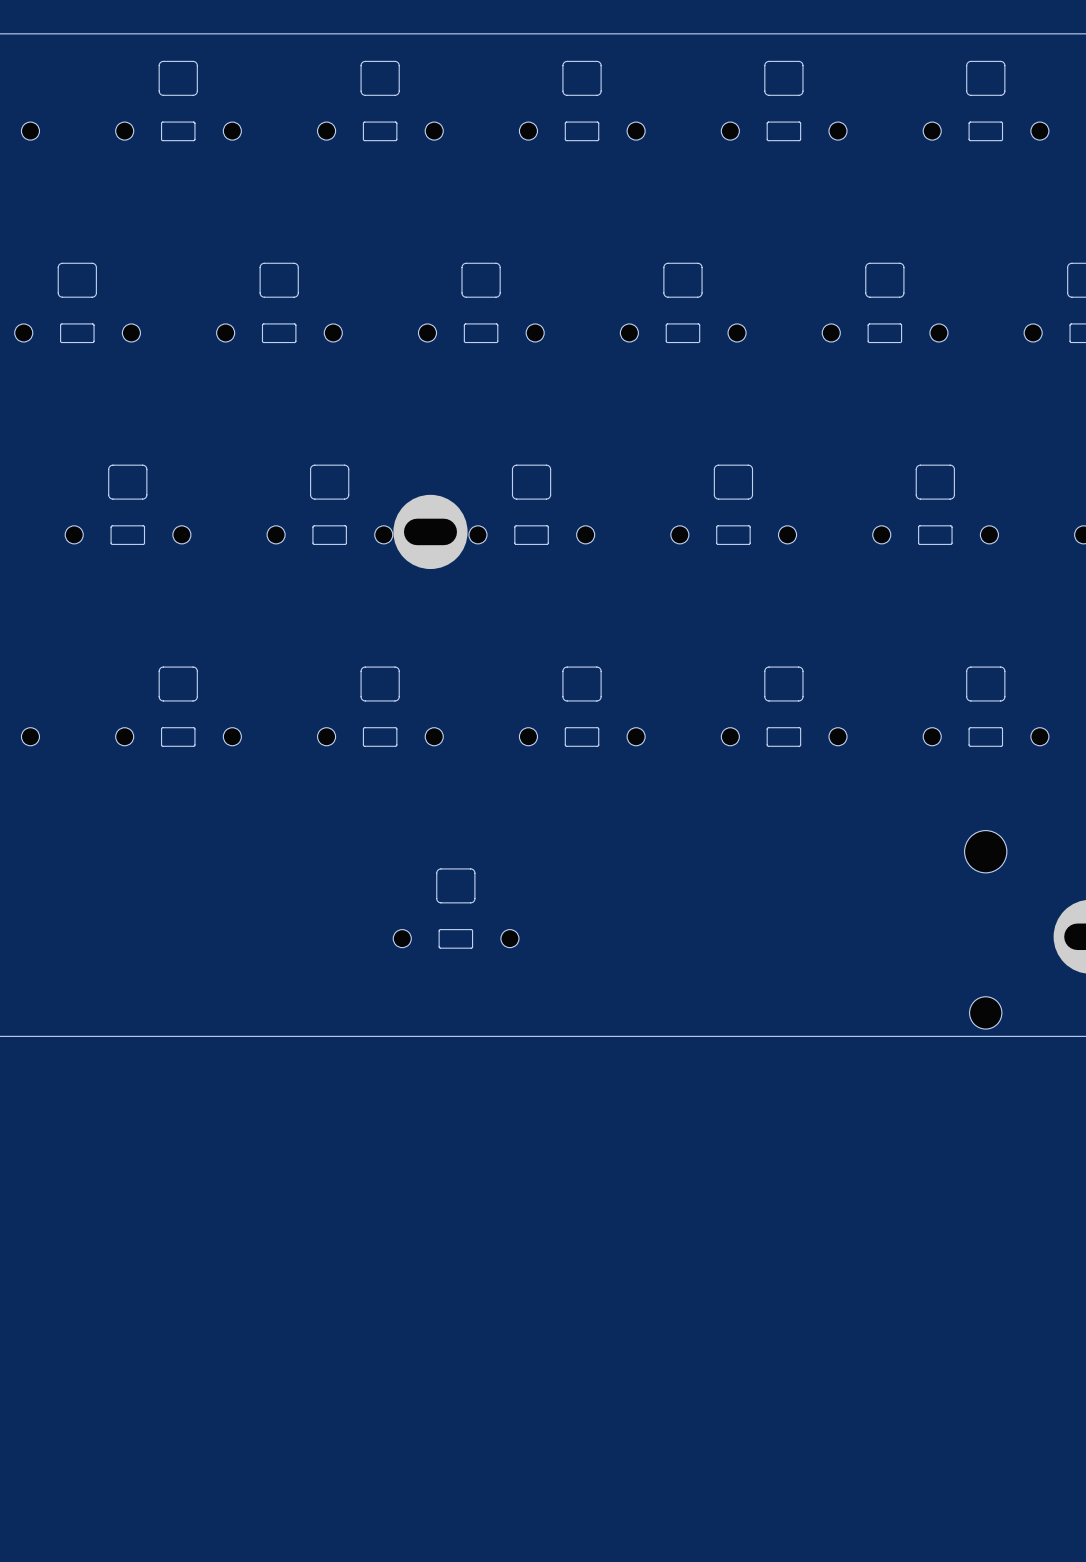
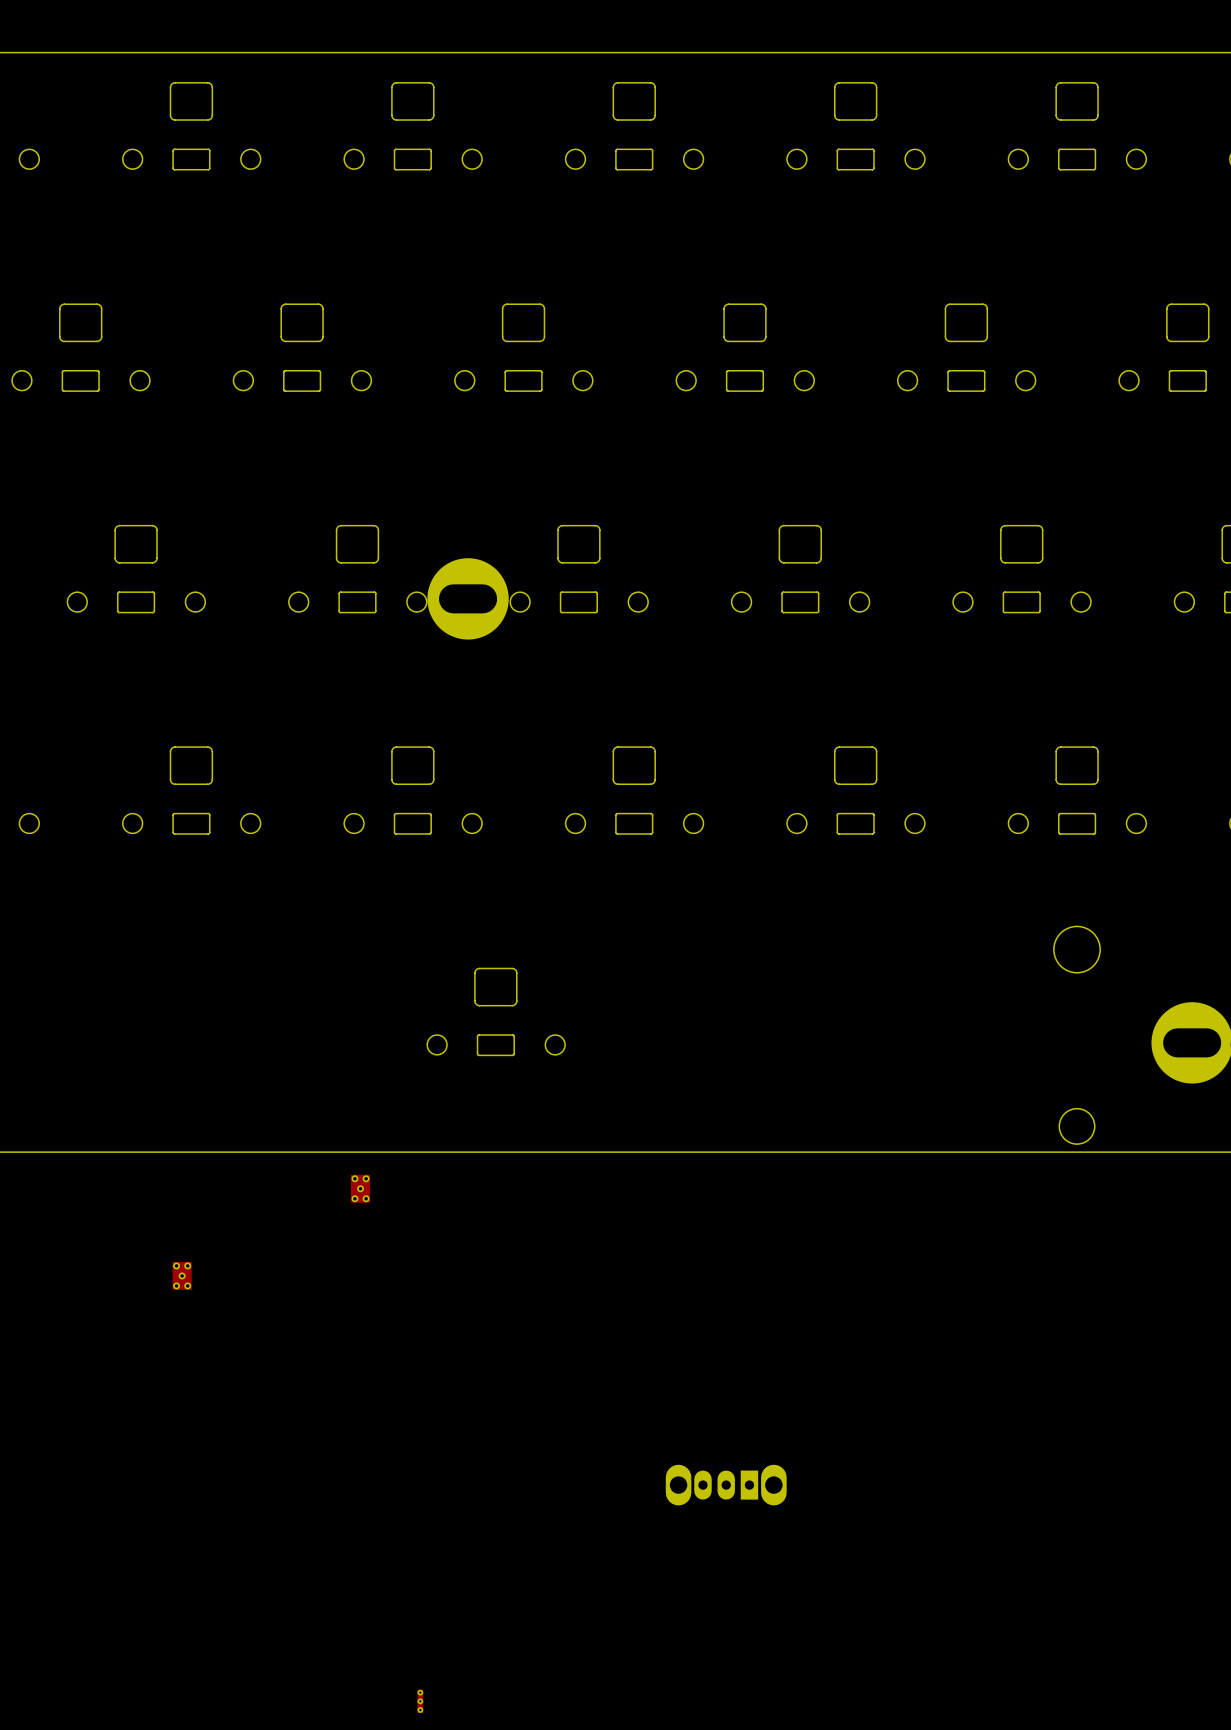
part: none -> (360, 1188)
part: none -> (182, 1275)
part: none -> (726, 1485)
part: none -> (420, 1701)

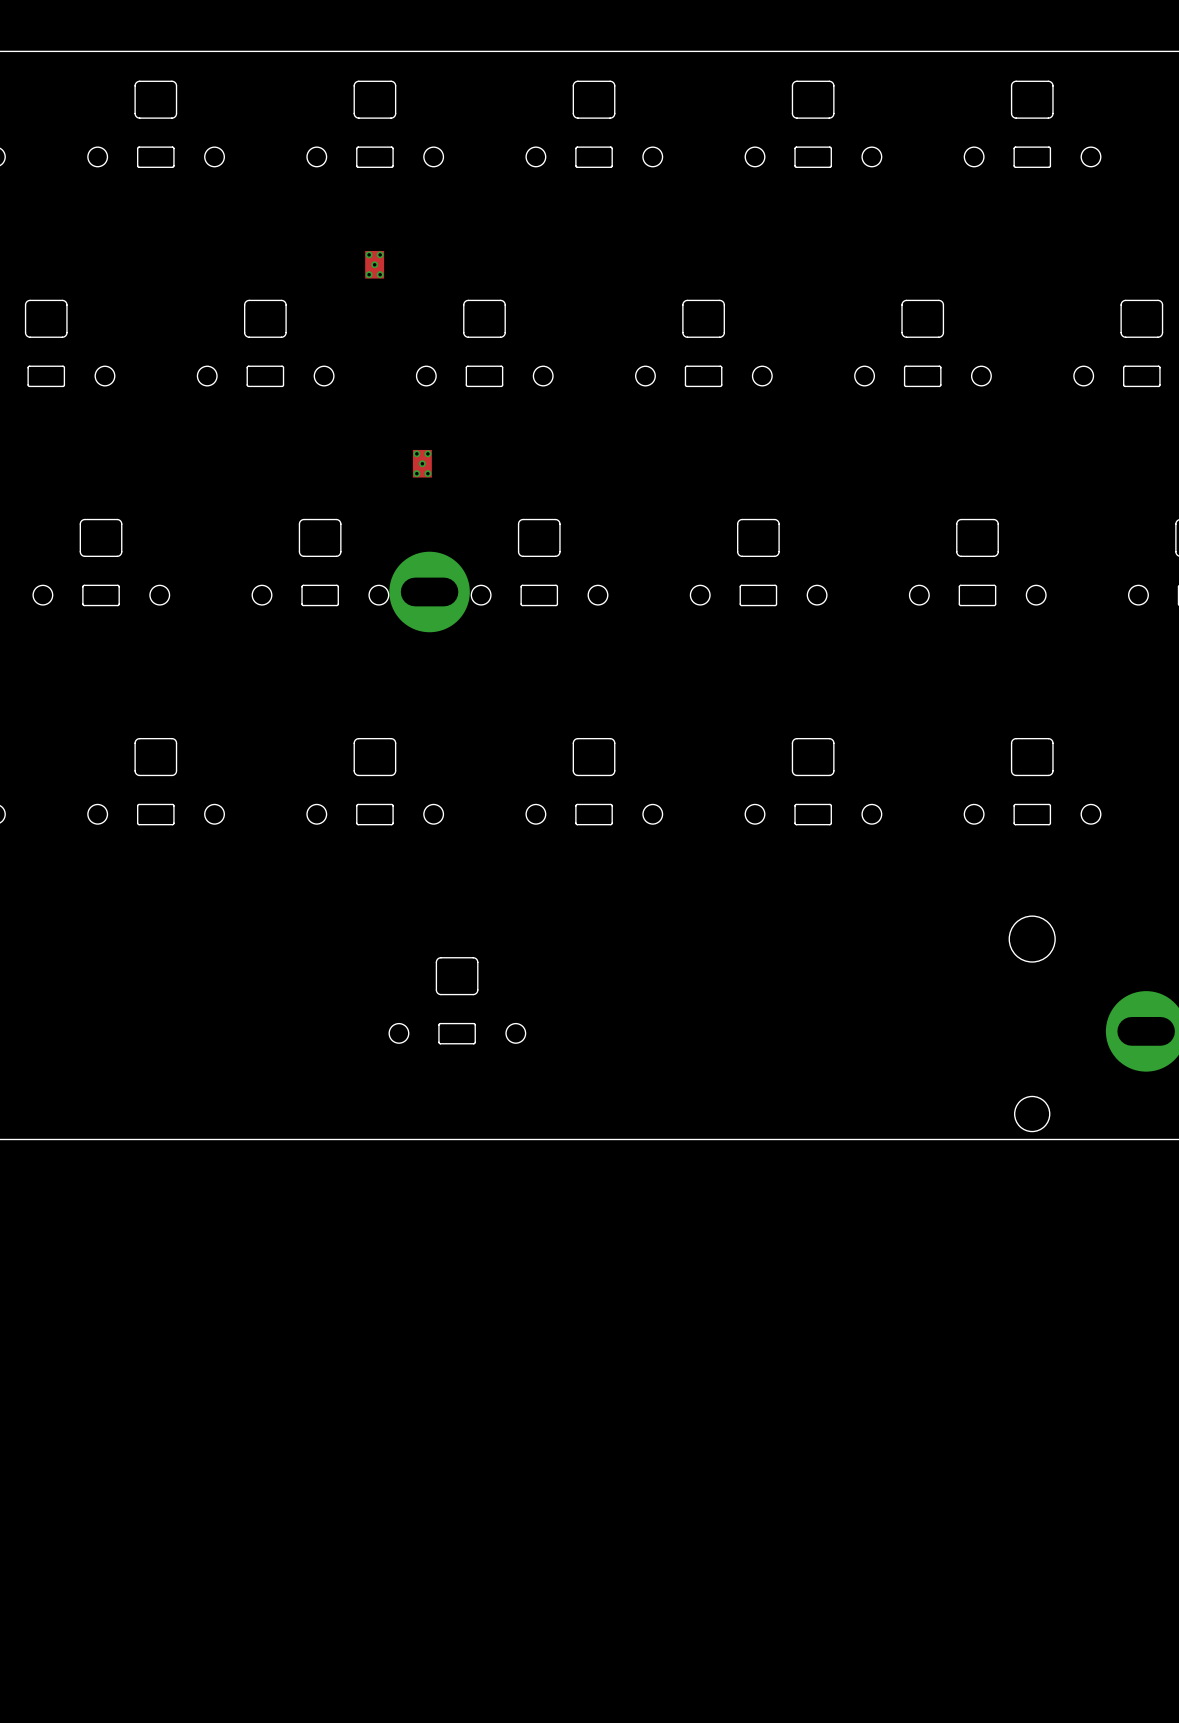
part: none -> (374, 264)
part: none -> (422, 463)
part: (360, 1188) -> none
part: (182, 1275) -> none
part: (726, 1485) -> none
part: (420, 1701) -> none

